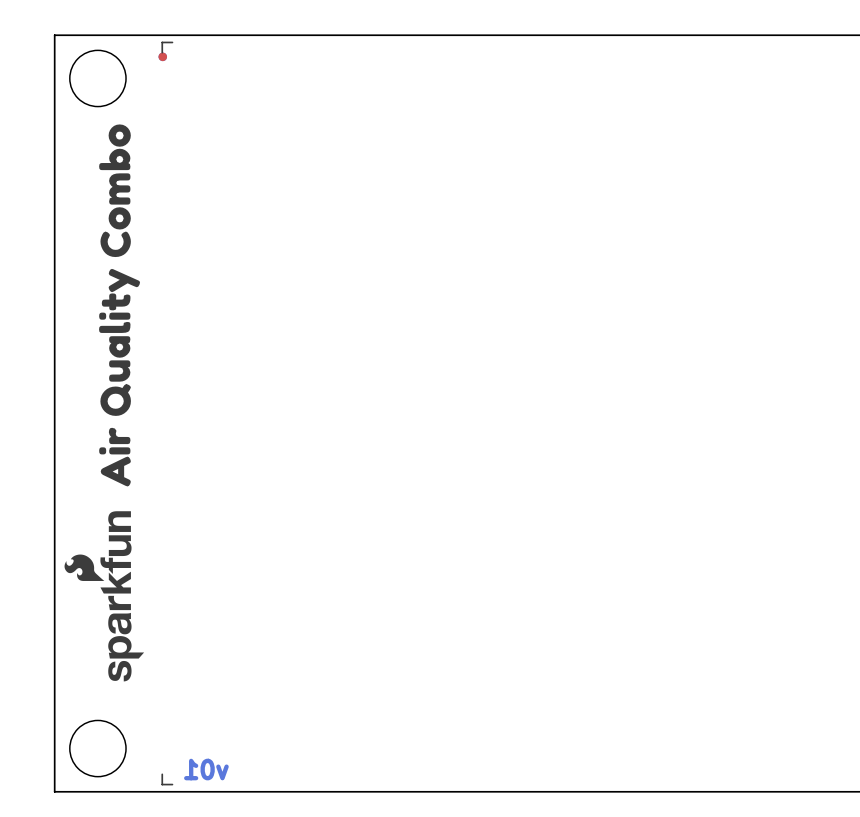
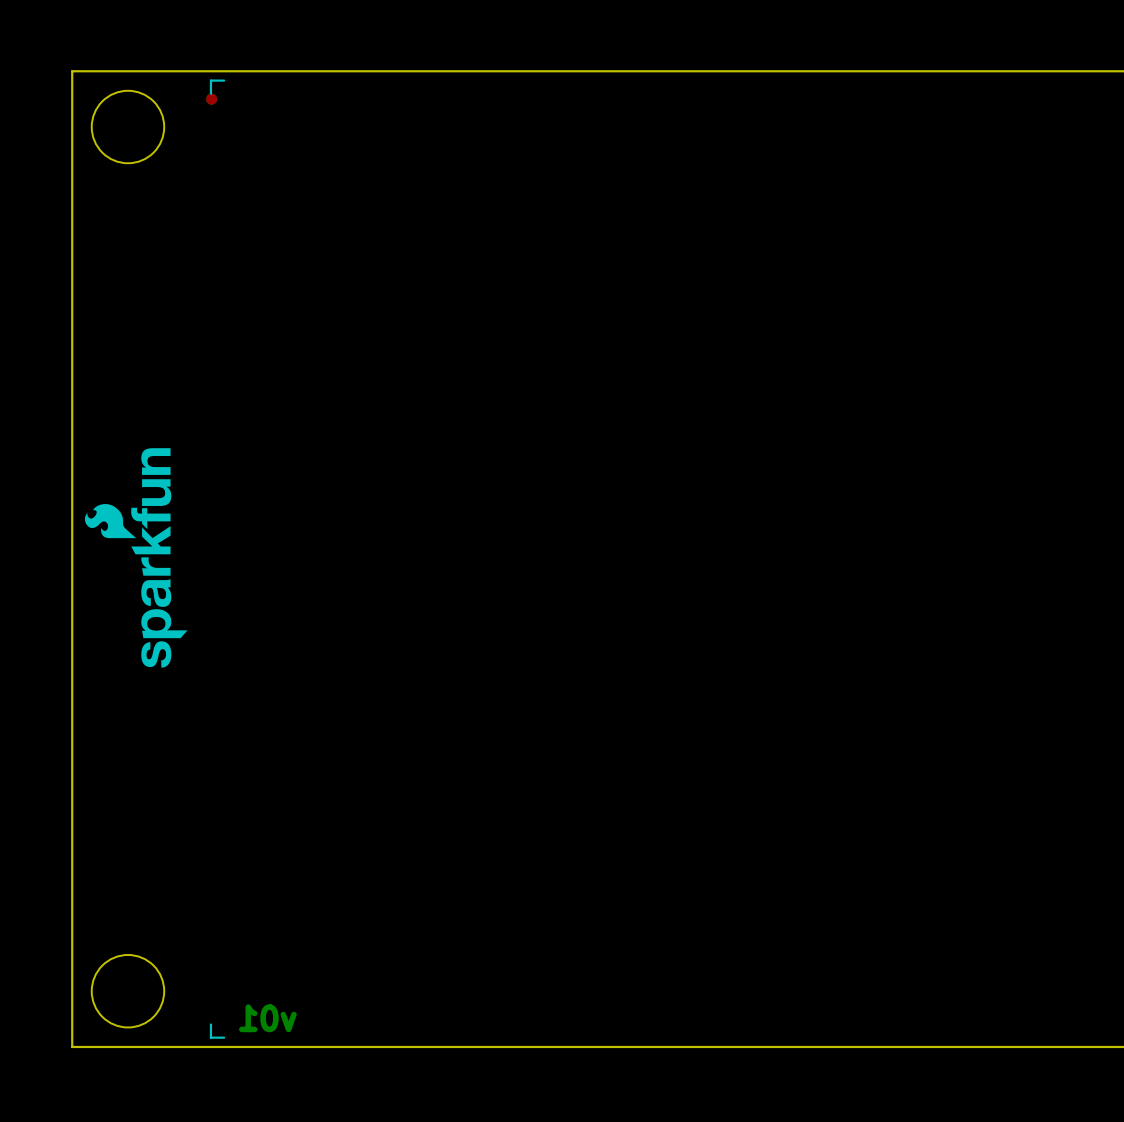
drawing: [99, 124, 141, 487] -> none
drawing position: (104, 596) -> (136, 557)

